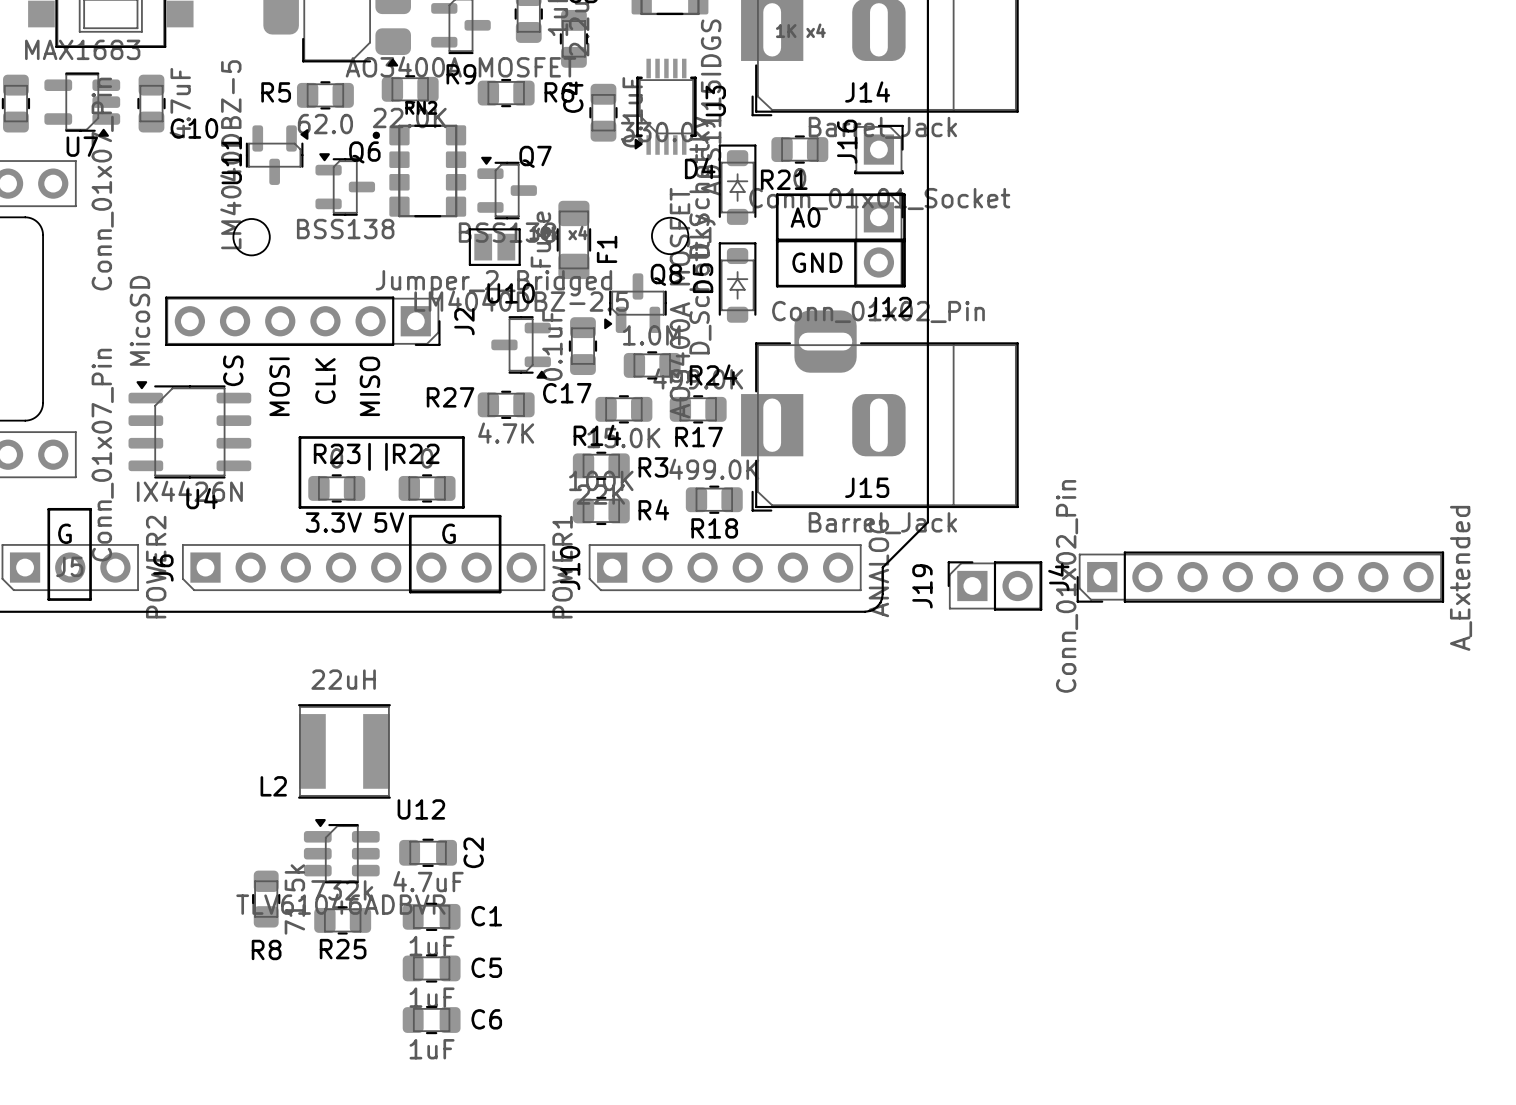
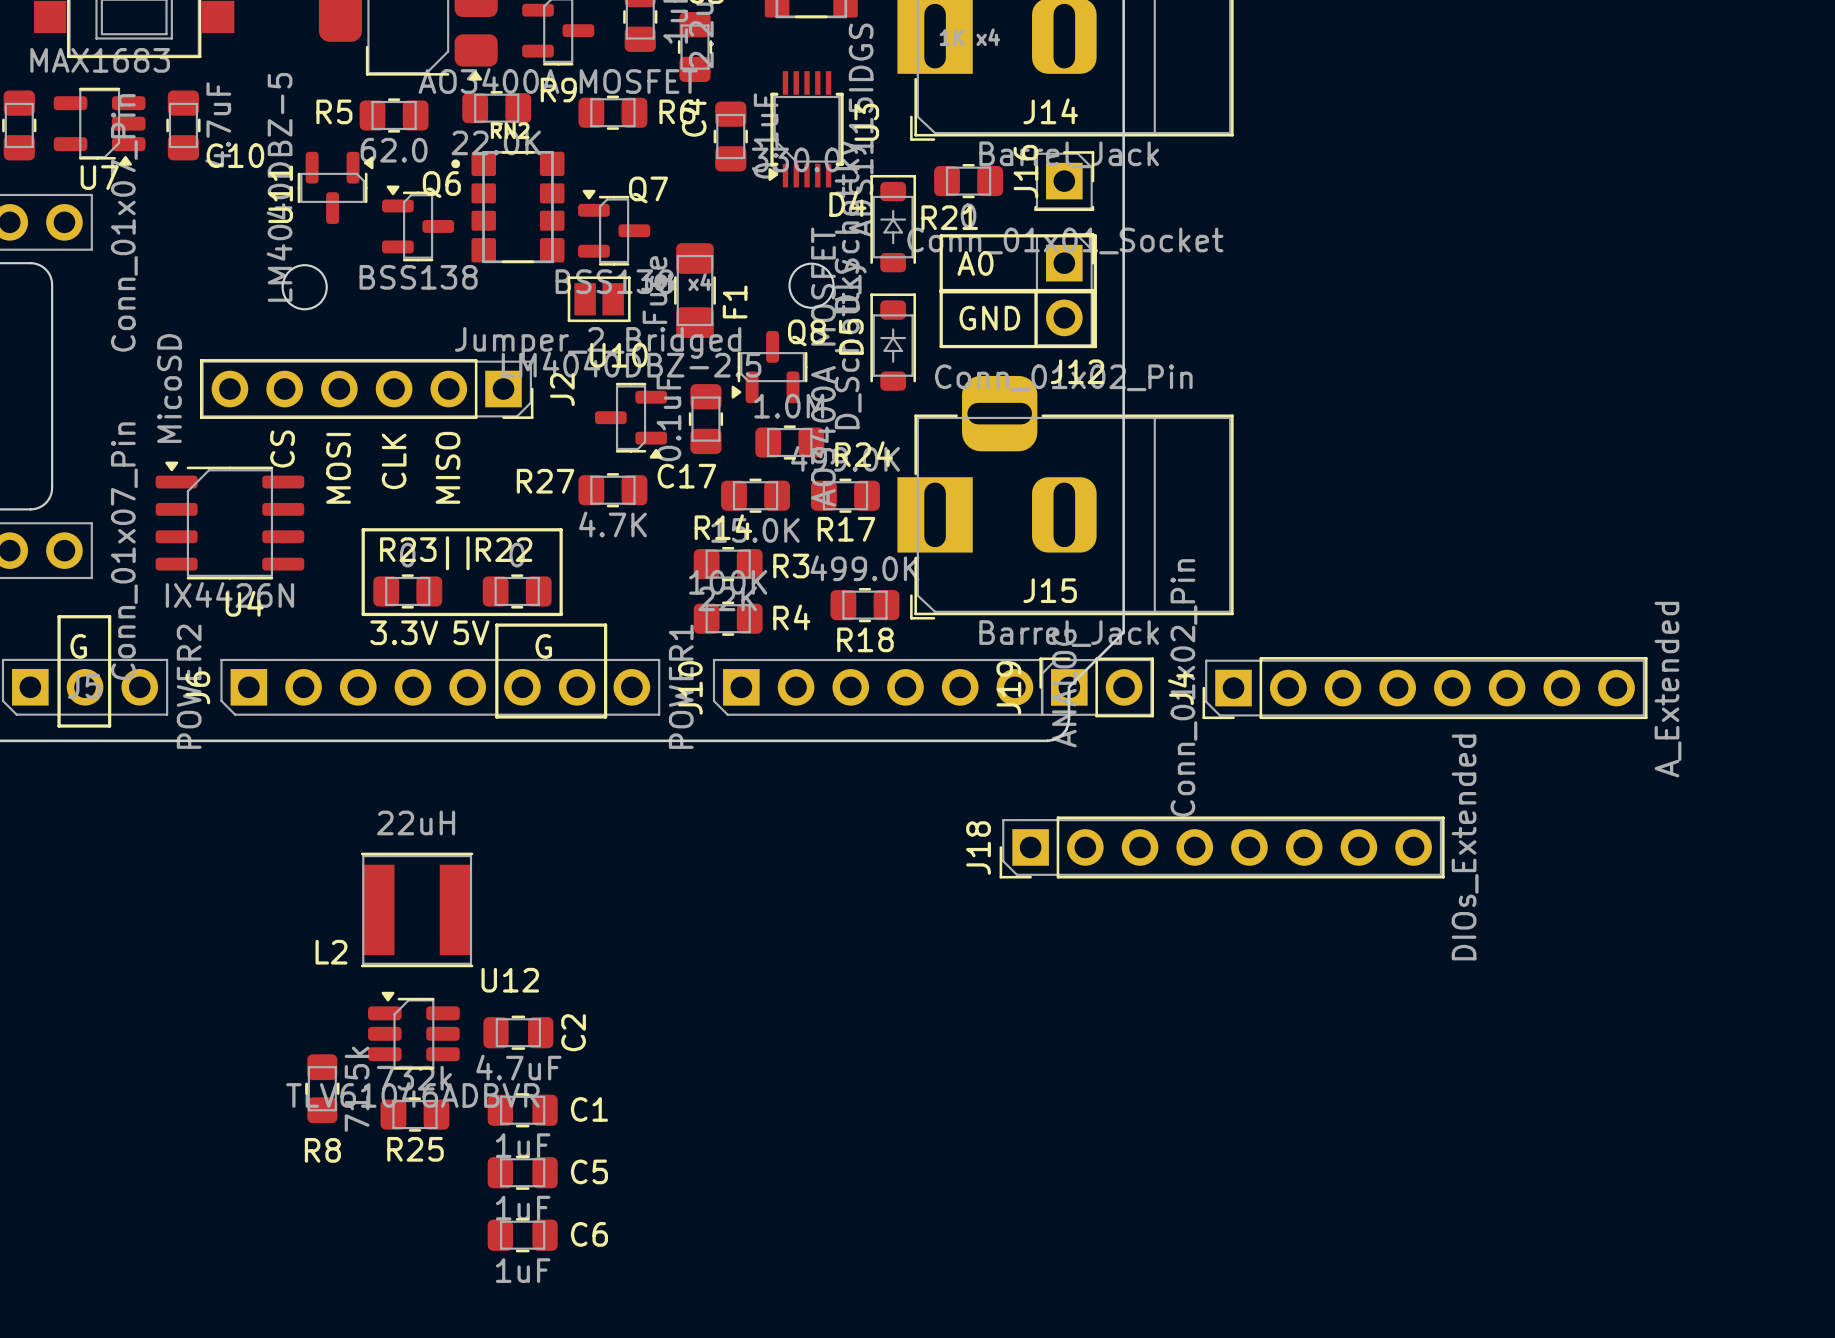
J4 position: (1260, 577) -> (1425, 688)
J19 position: (994, 585) -> (1096, 687)
J18: none -> DIOs_Extended (1222, 847)

